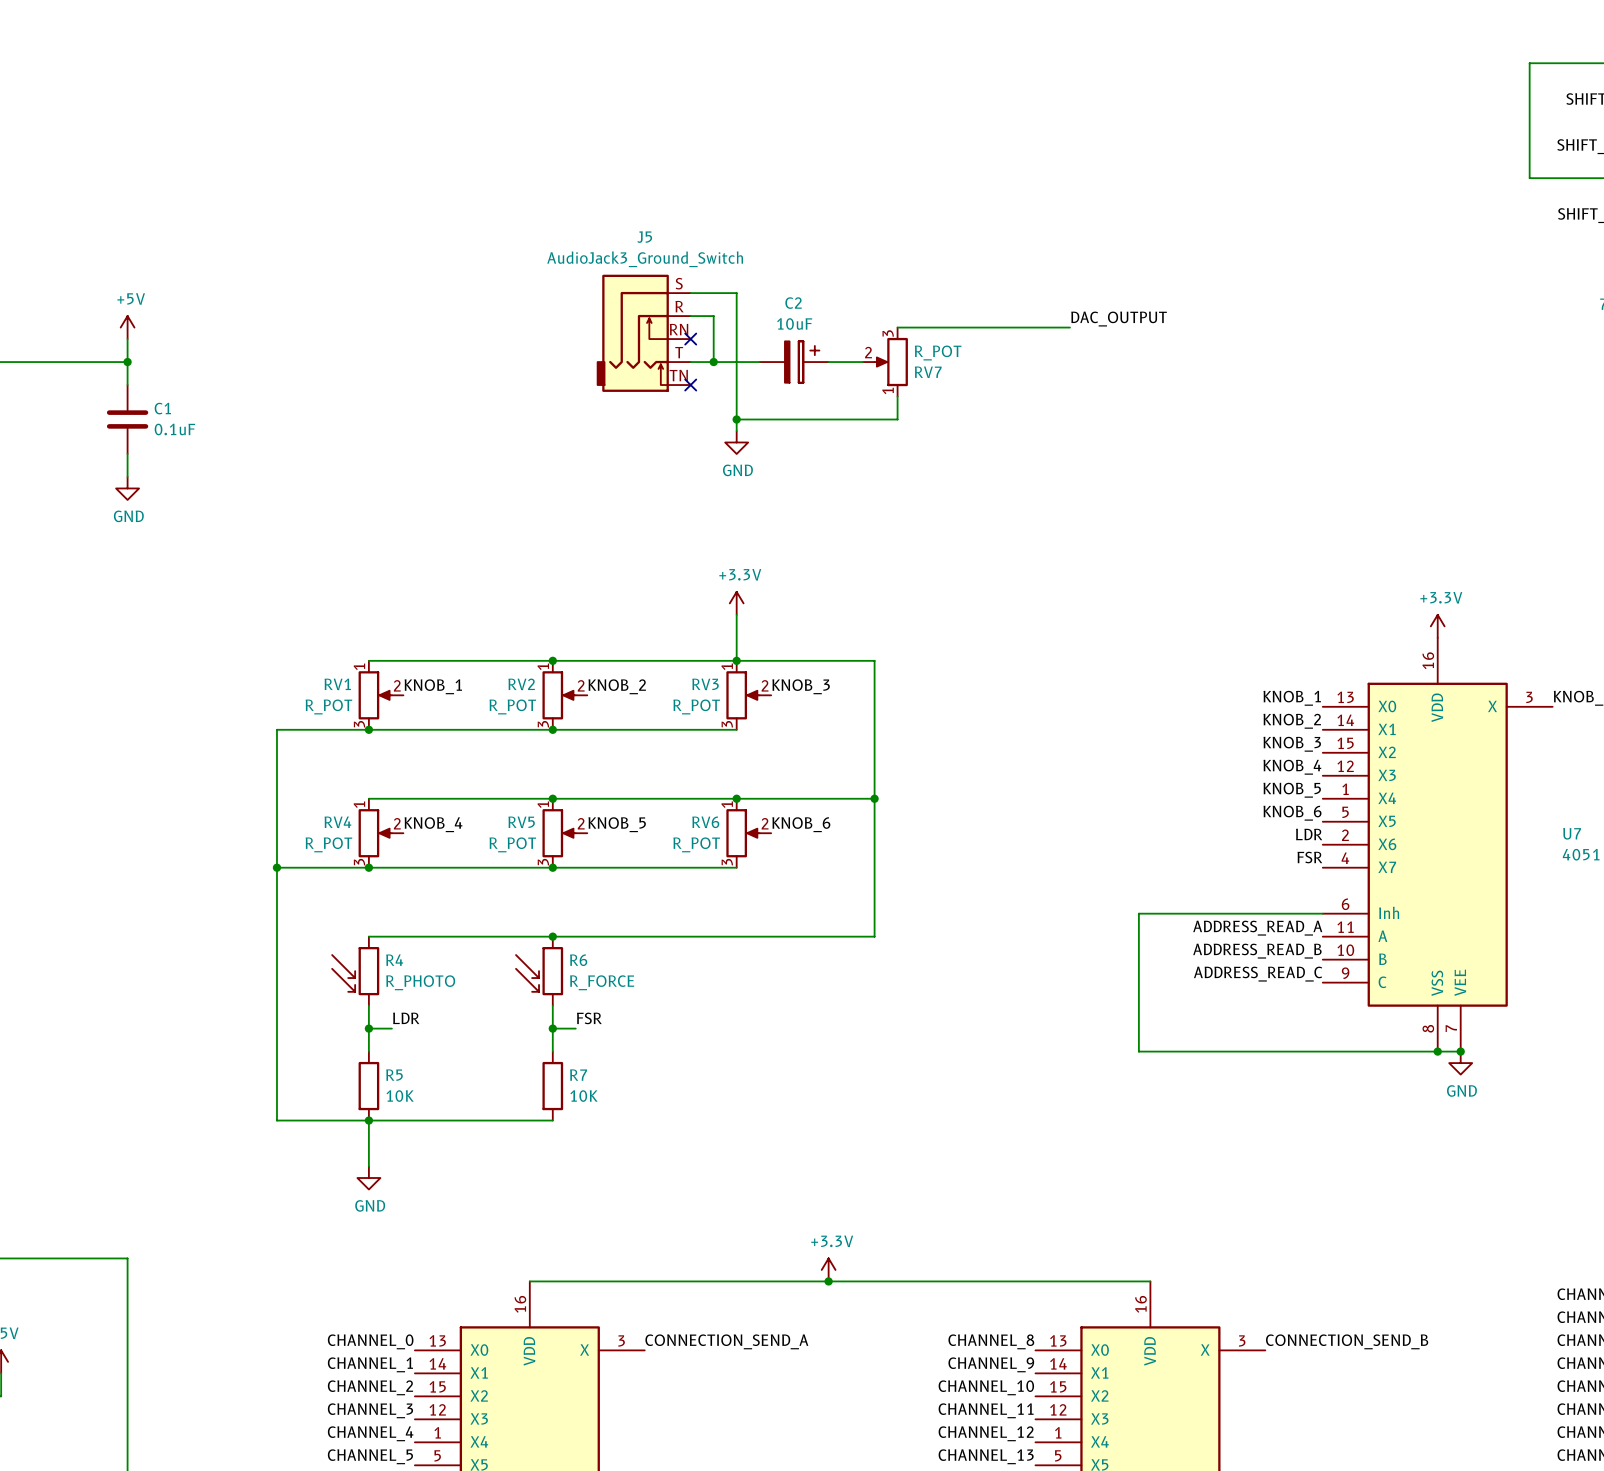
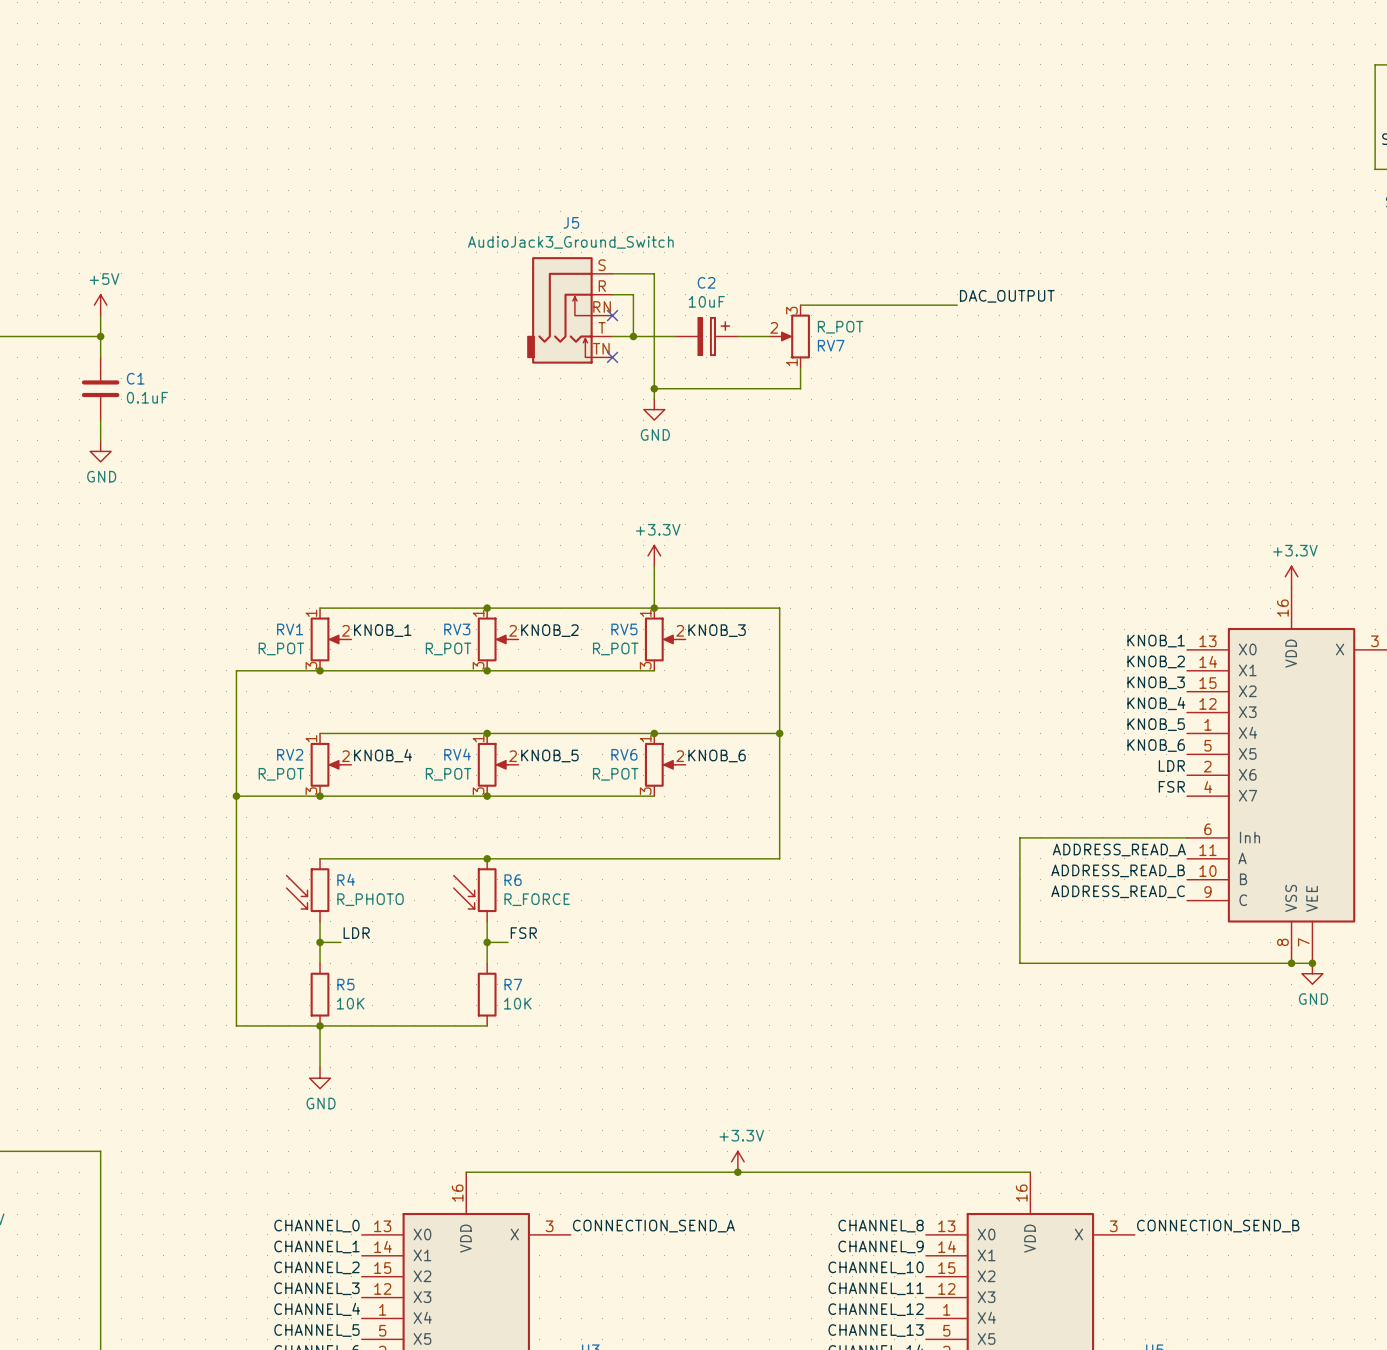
RV2 name: RV2 (521, 684) -> RV3 (457, 629)
RV3 name: RV3 (705, 684) -> RV5 (624, 629)
RV4 name: RV4 (337, 822) -> RV2 (290, 754)
RV5 name: RV5 (521, 822) -> RV4 (457, 754)

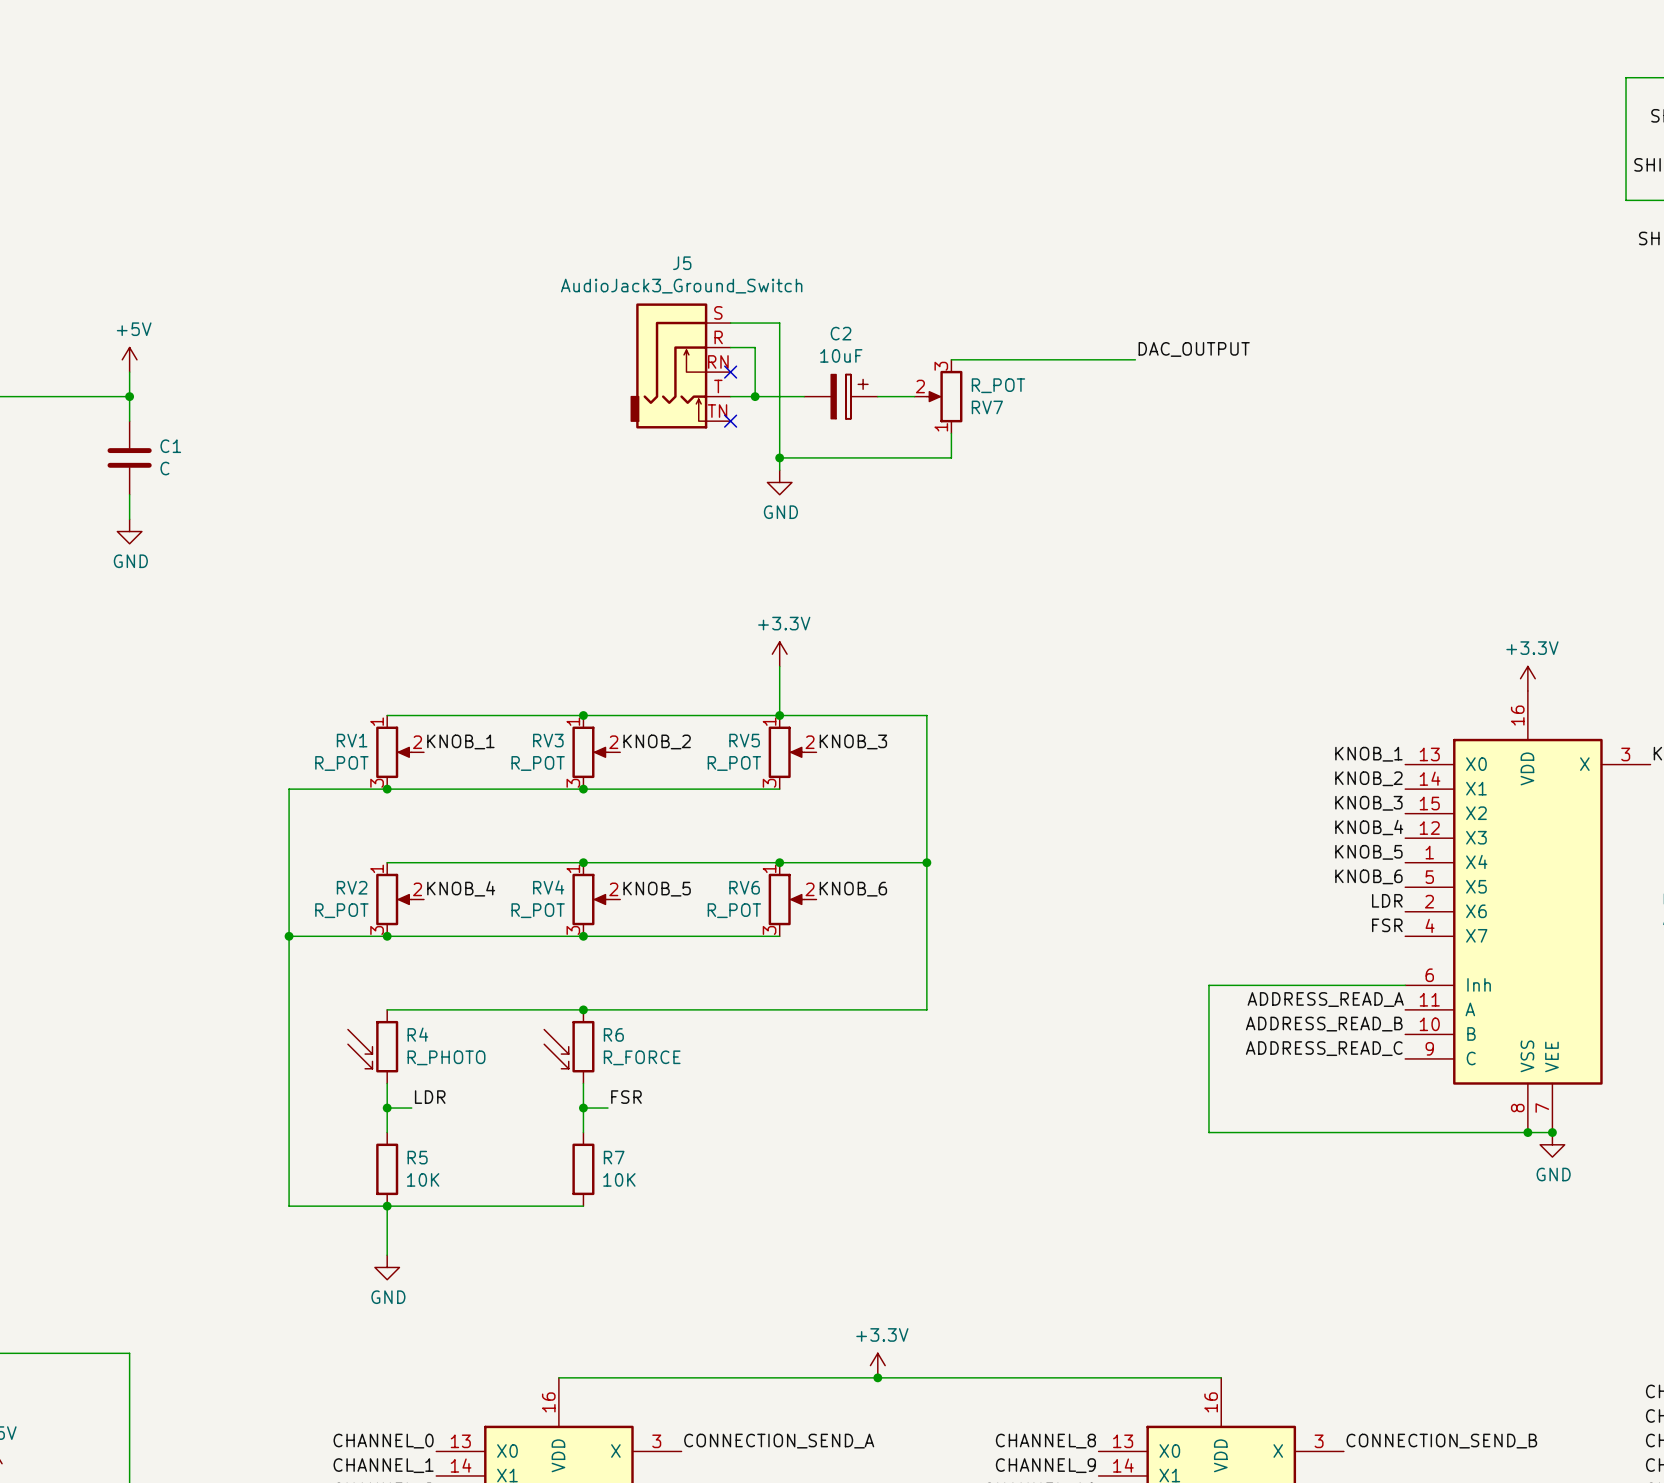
C1 value: 0.1uF (147, 397) -> C (164, 468)

